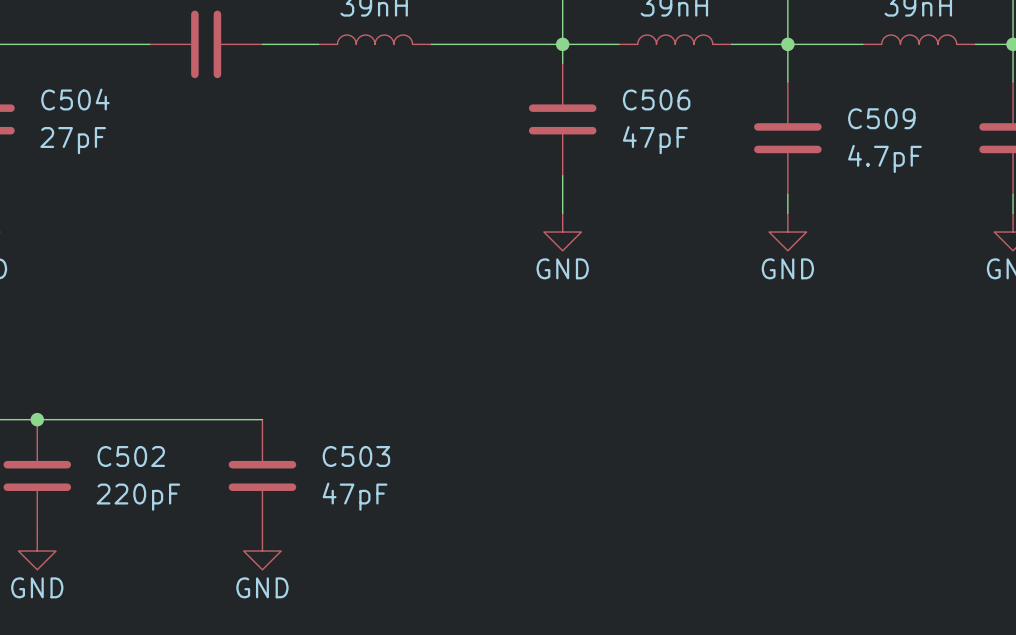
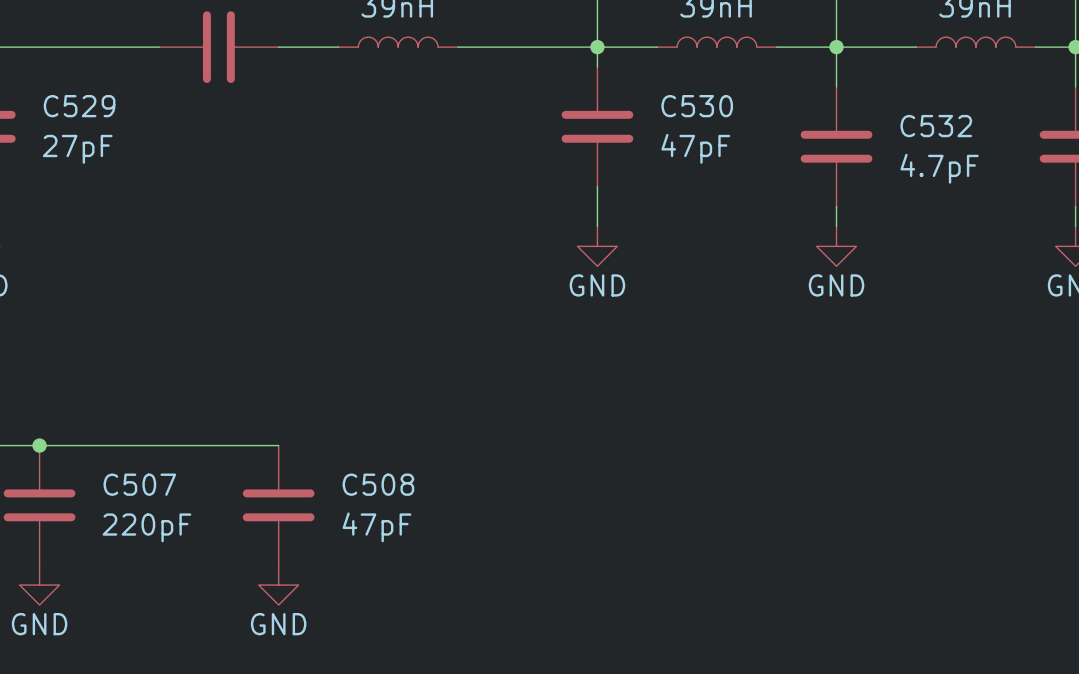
C504 name: C504 (75, 99) -> C529 (79, 106)
C506 name: C506 (656, 99) -> C530 (697, 106)
C509 name: C509 (881, 118) -> C532 (936, 126)
C502 name: C502 (131, 456) -> C507 (139, 484)
C503 name: C503 (356, 456) -> C508 (378, 484)

